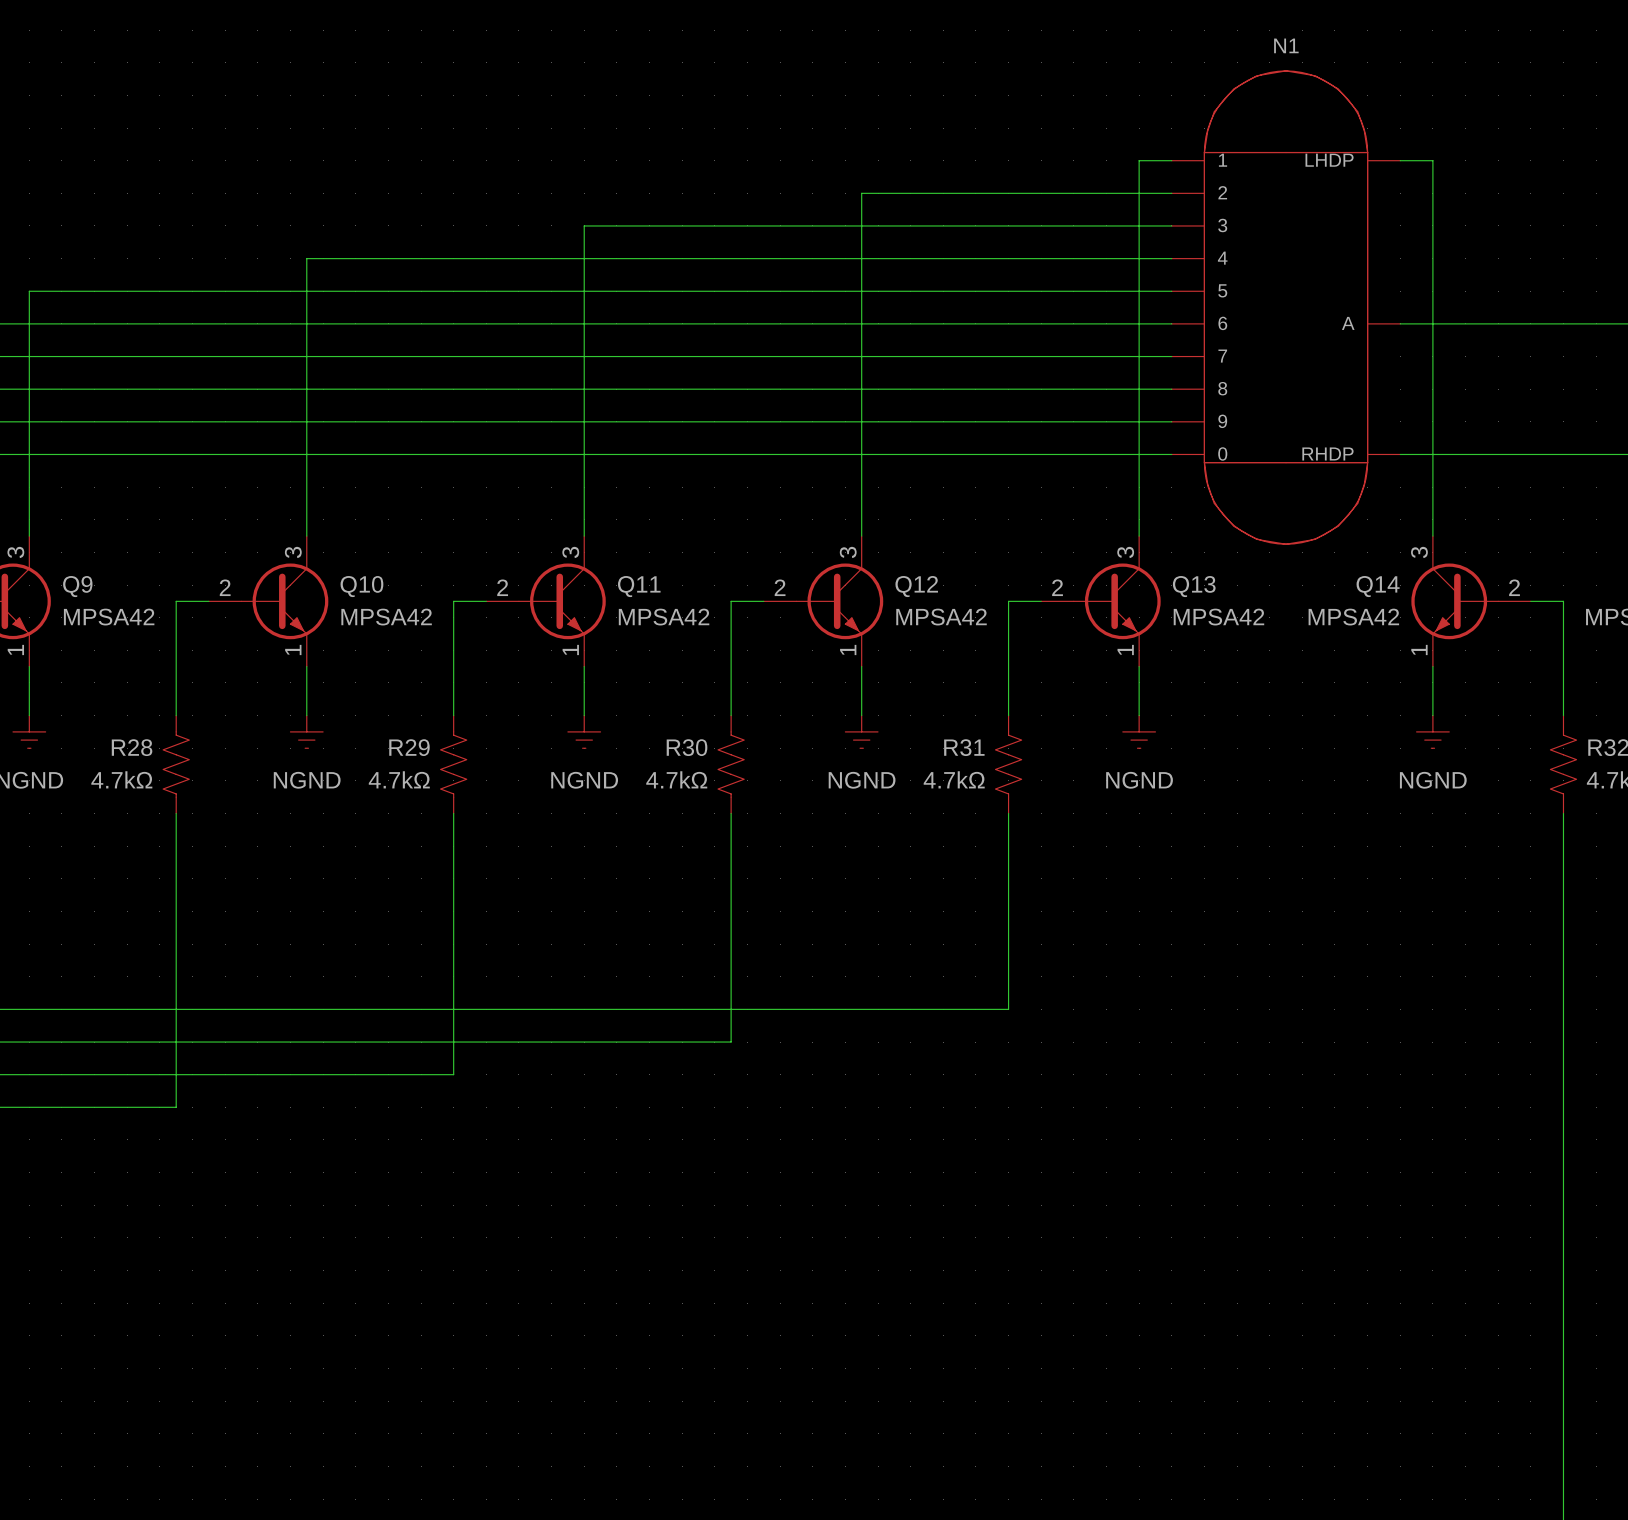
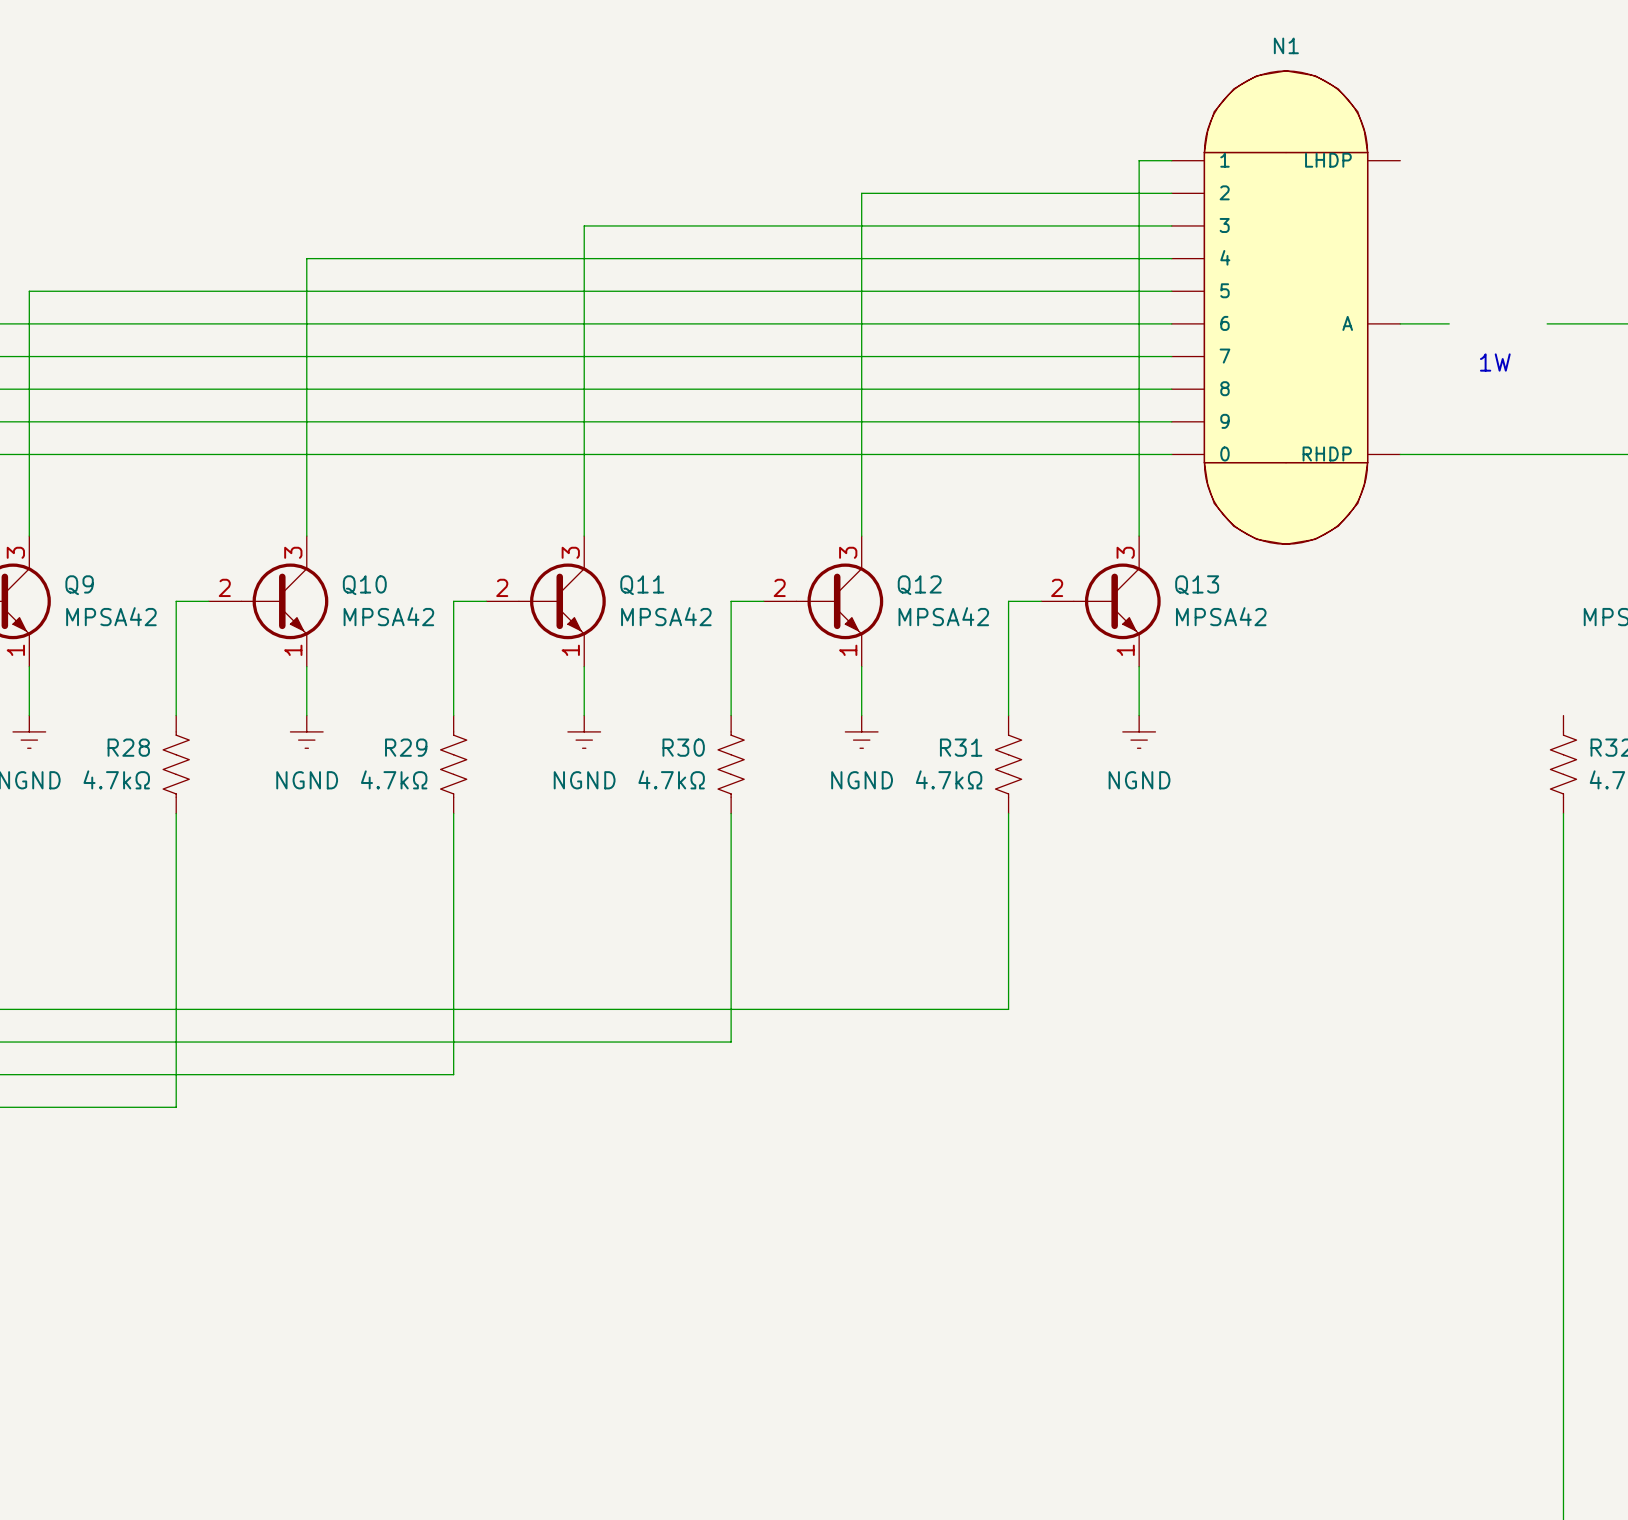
wire: (1400, 160) (1432, 160) (1432, 536) -> none
wire: (1449, 323) (1547, 323) -> none
text: none -> 1W (1495, 362)
Q14: MPSA42 (1471, 601) -> none
wire: (1530, 601) (1563, 601) (1563, 715) -> none
wire: (1432, 666) (1432, 715) -> none
power symbol: NGND (1432, 731) -> none

